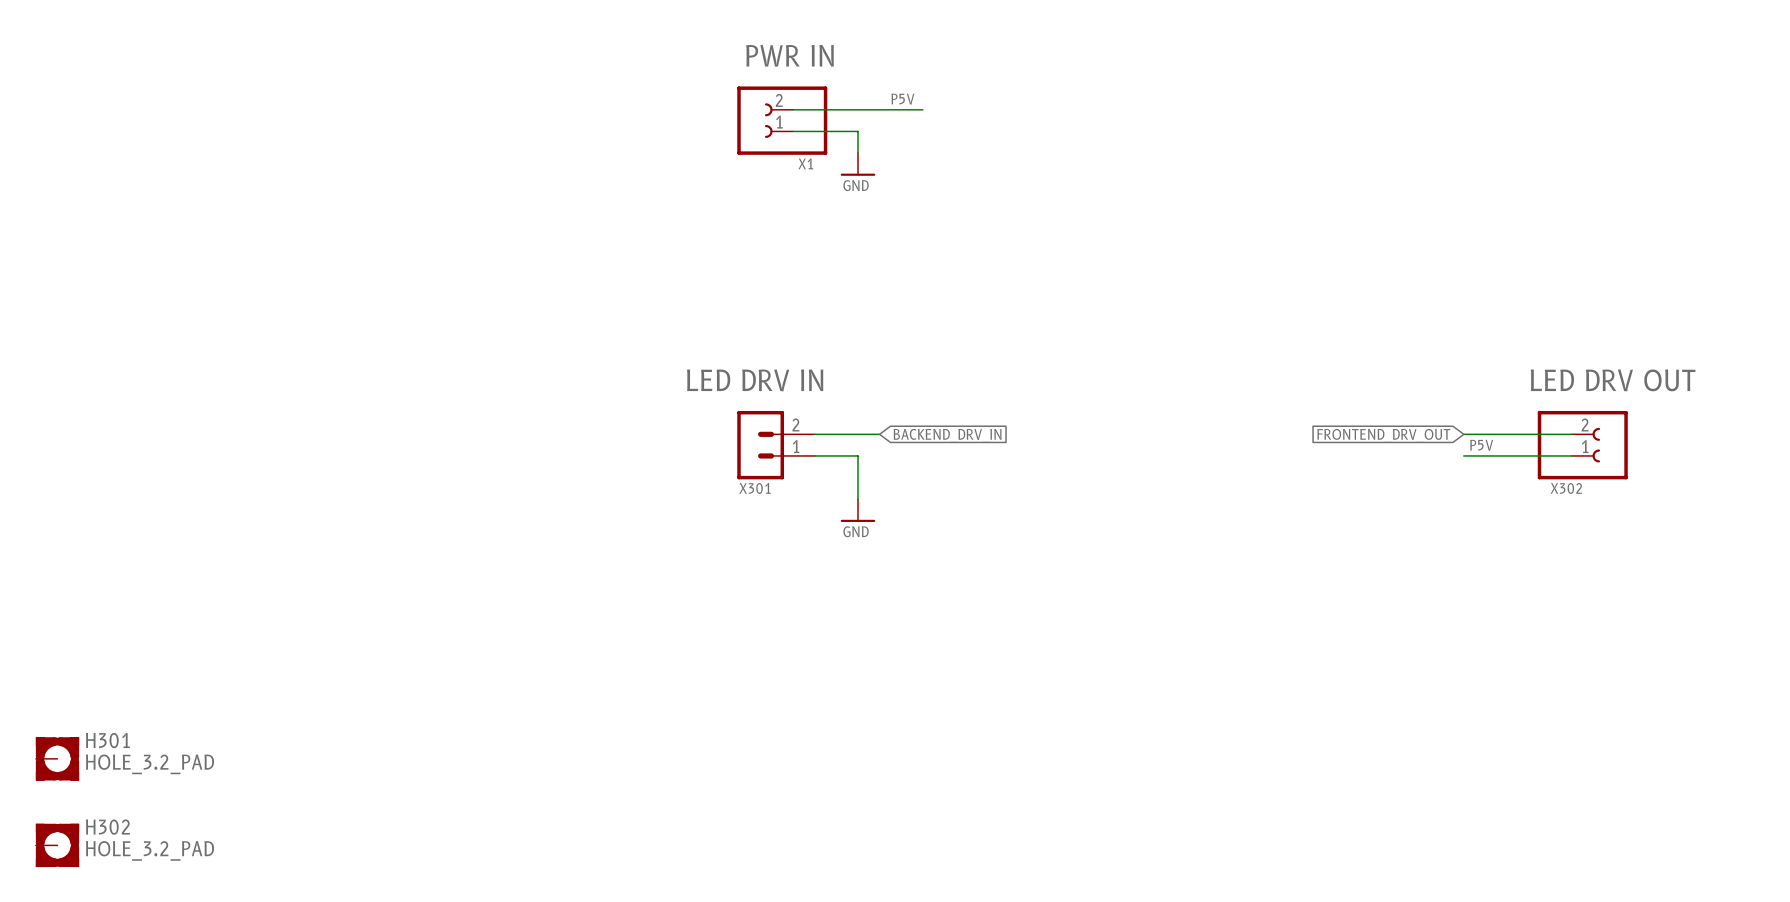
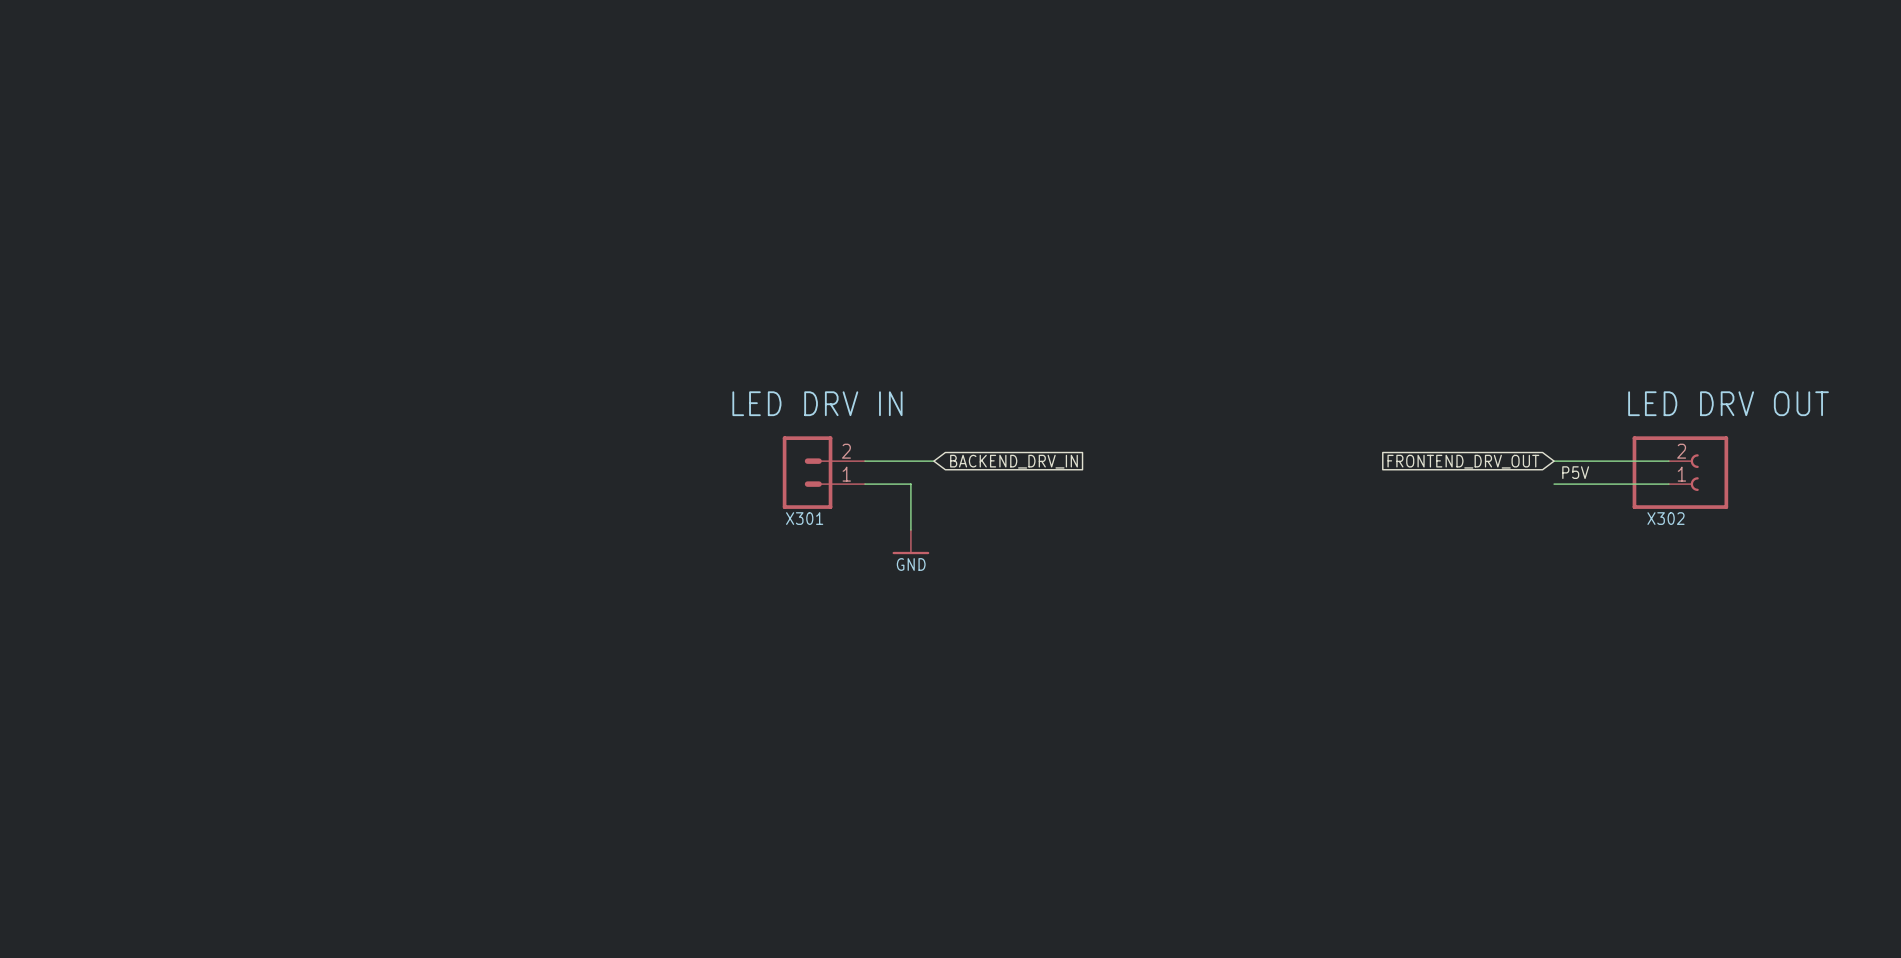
label: P5V (902, 99) -> none
wire: (793, 109) (922, 109) -> none
X1: (782, 120) -> none
wire: (793, 131) (857, 131) (857, 153) -> none
power symbol: GND (857, 164) -> none
H301: HOLE_3.2_PAD (57, 758) -> none
H302: HOLE_3.2_PAD (57, 845) -> none

